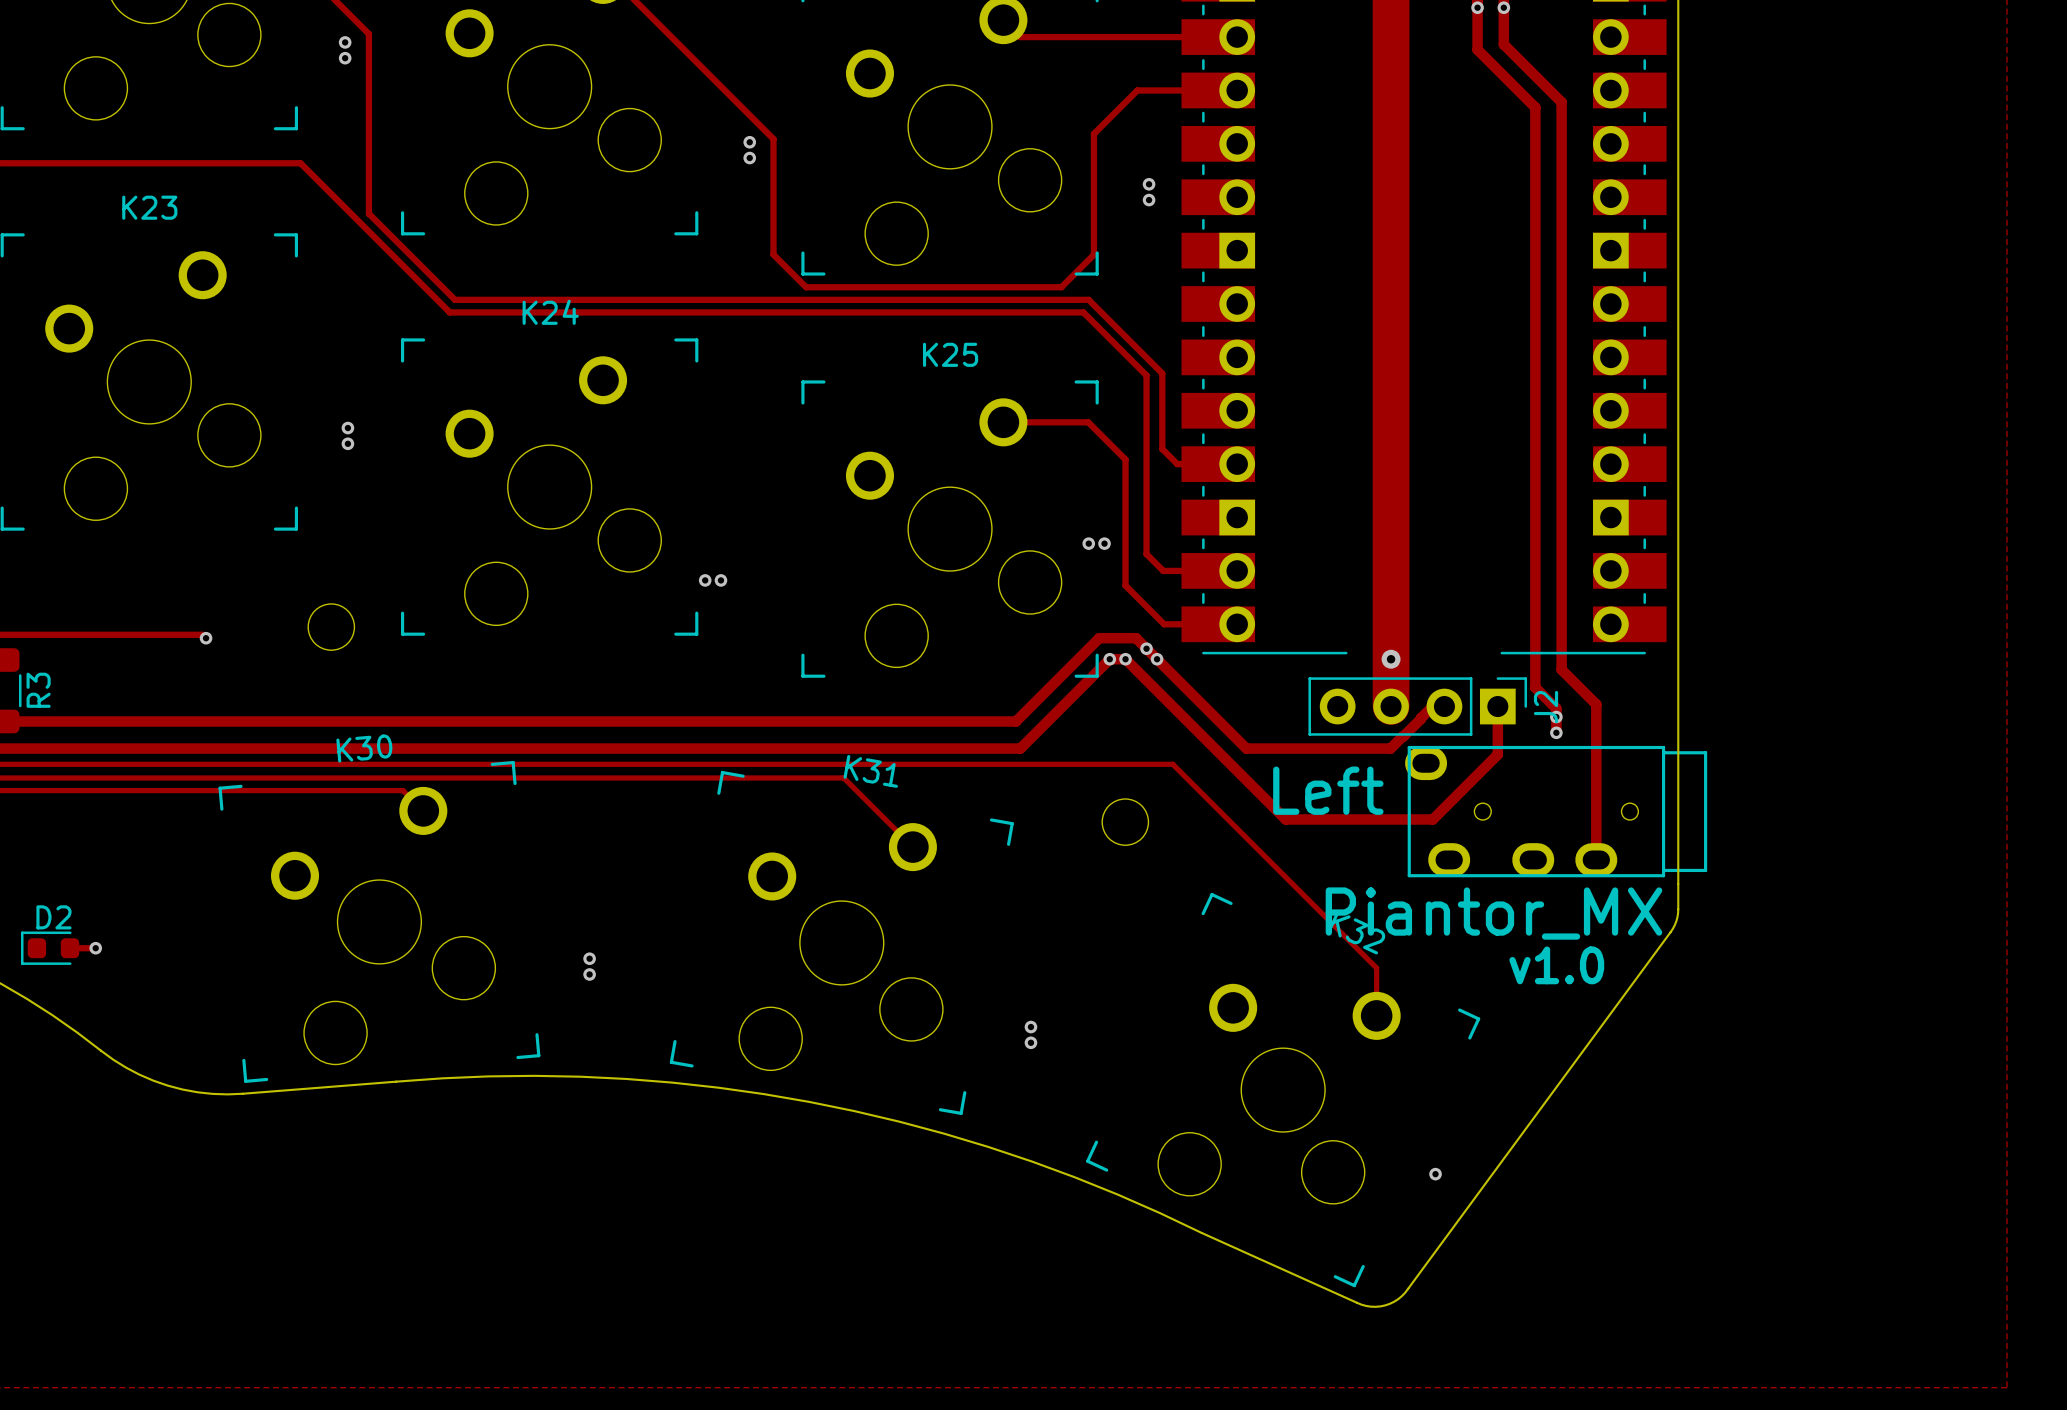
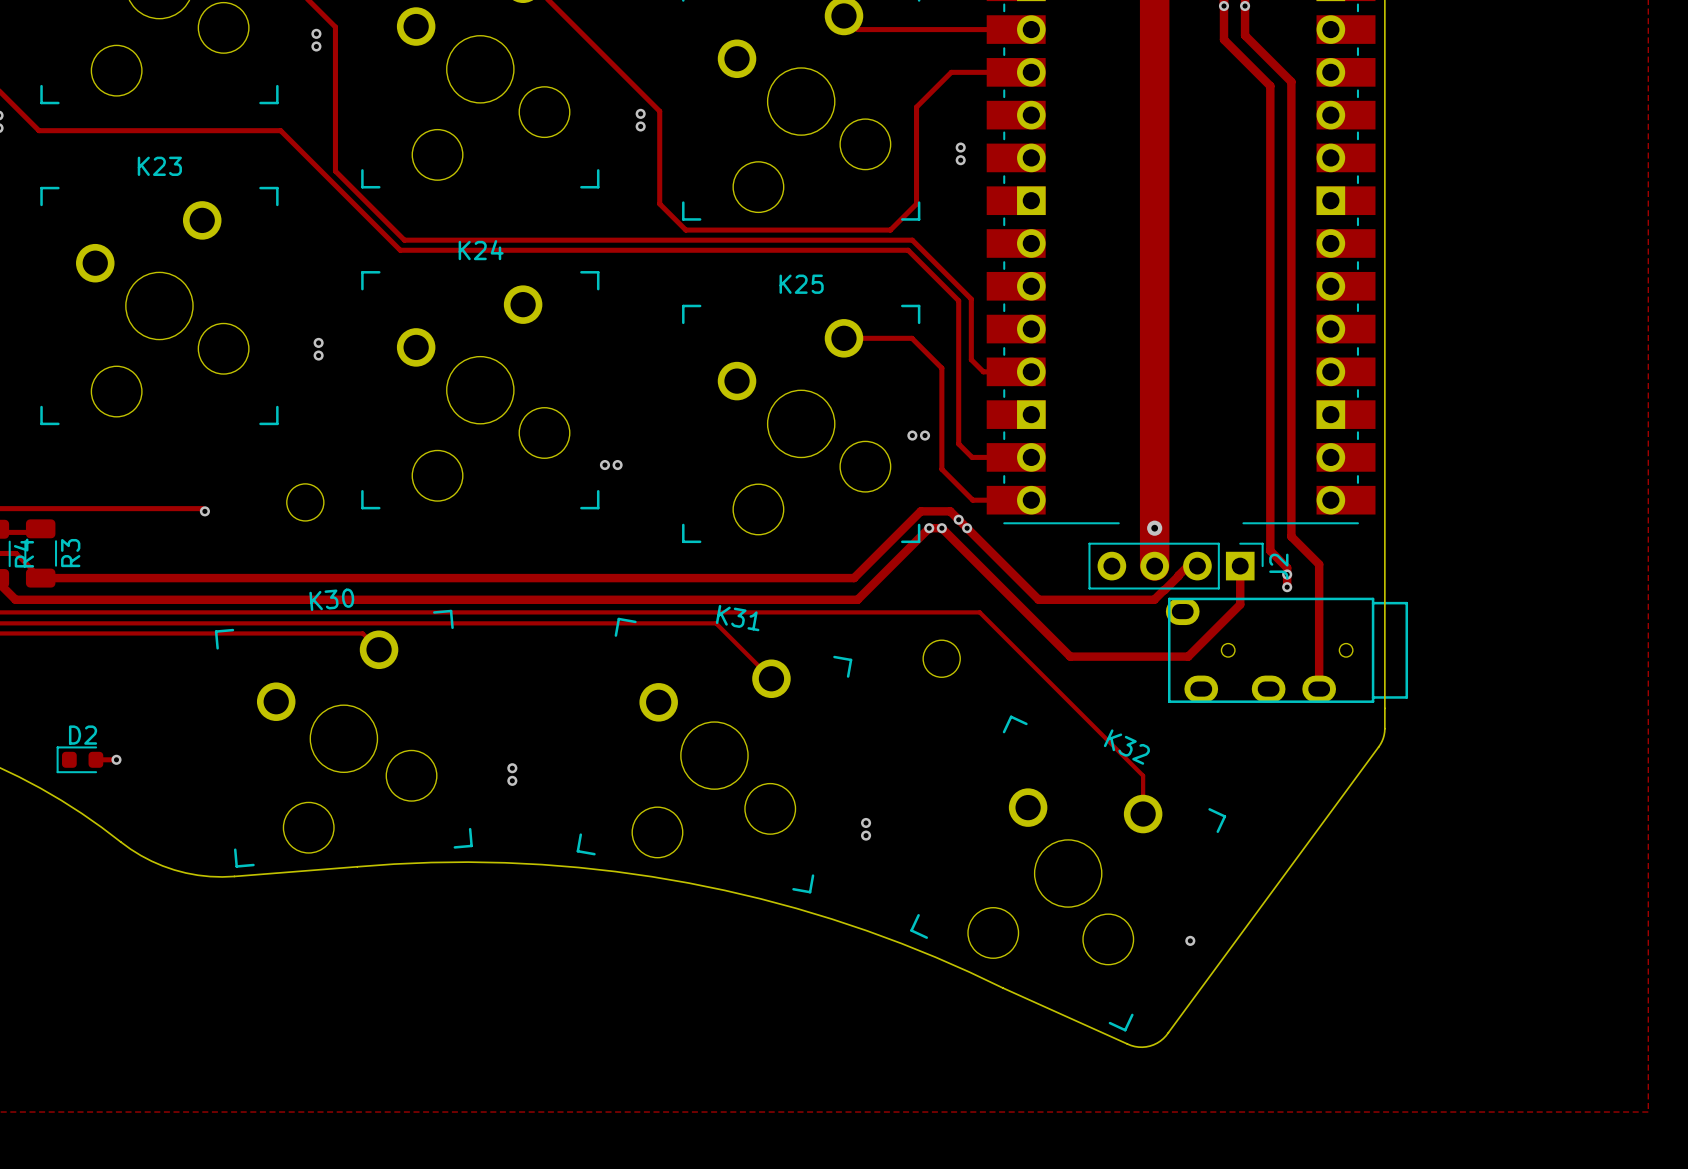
text: Left (1328, 790) -> none
text: Piantor_MX (1493, 913) -> none
text: v1.0 (1556, 965) -> none

